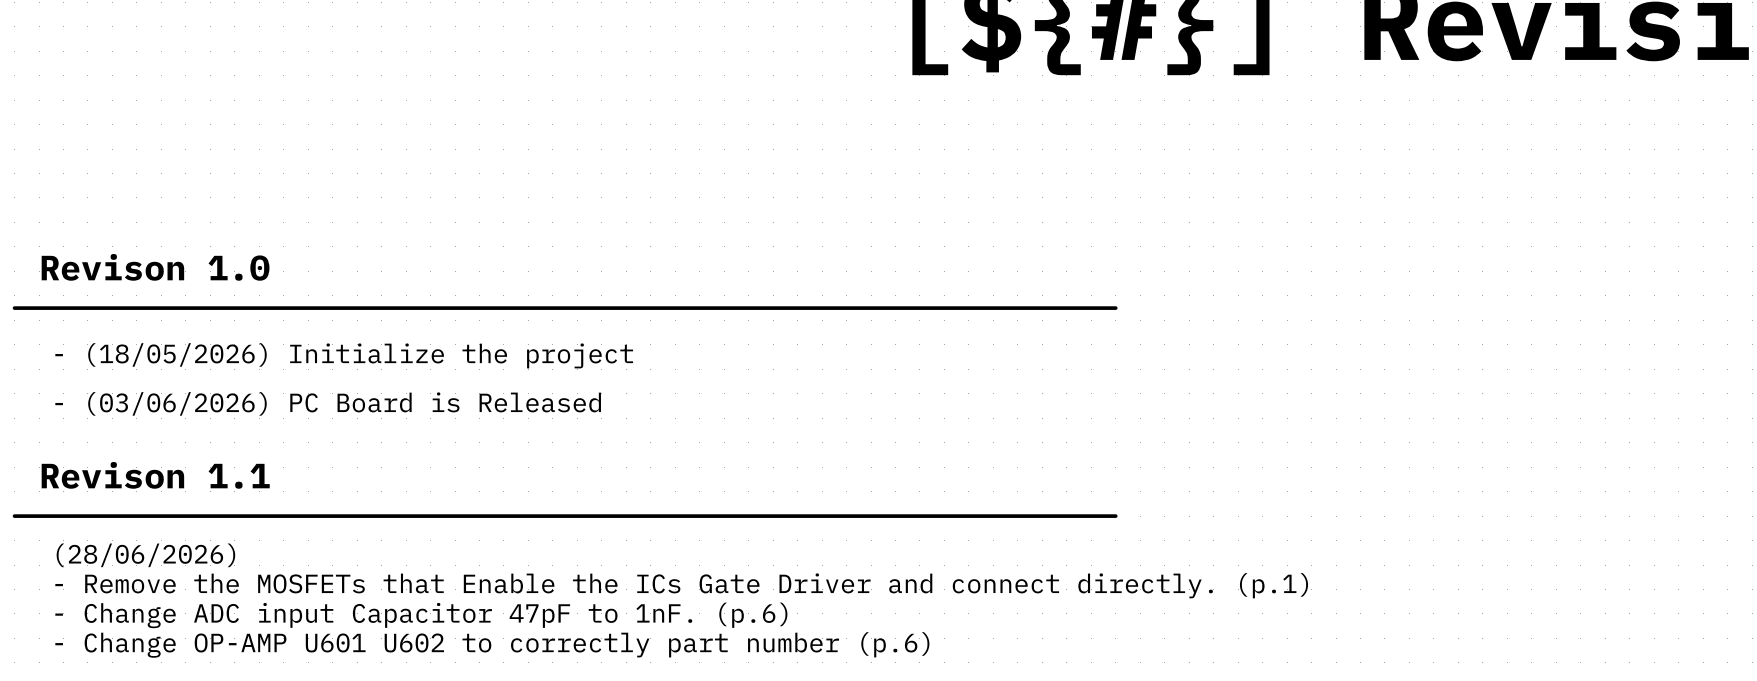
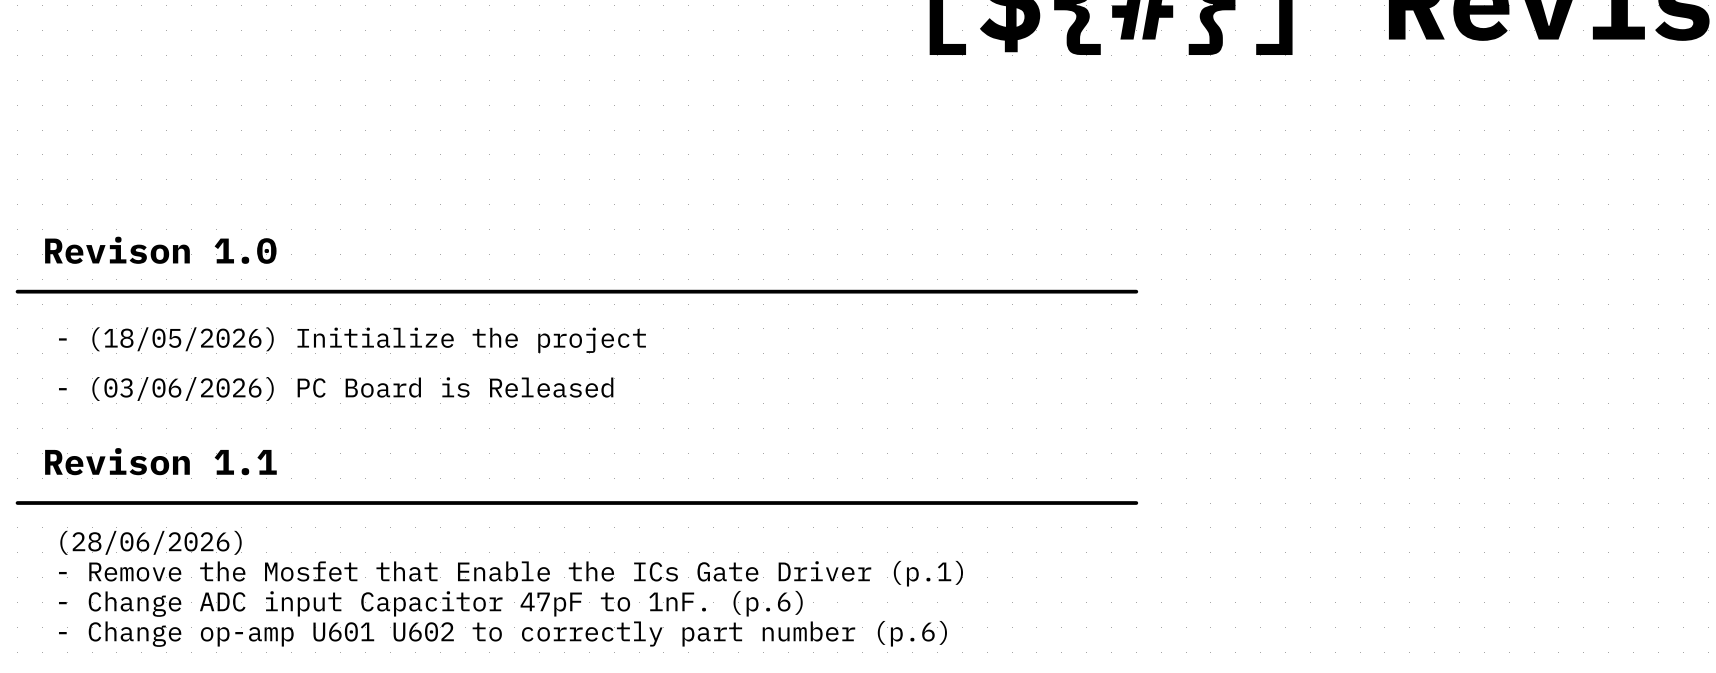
text: - Remove the MOSFETs that Enable the ICs Gate Driver and connect directly. (p.1) (681, 585) -> - Remove the Mosfet that Enable the ICs Gate Driver (p.1) (511, 573)
text: - Change OP-AMP U601 U602 to correctly part number (p.6) (492, 644) -> - Change op-amp U601 U602 to correctly part number (p.6) (502, 633)

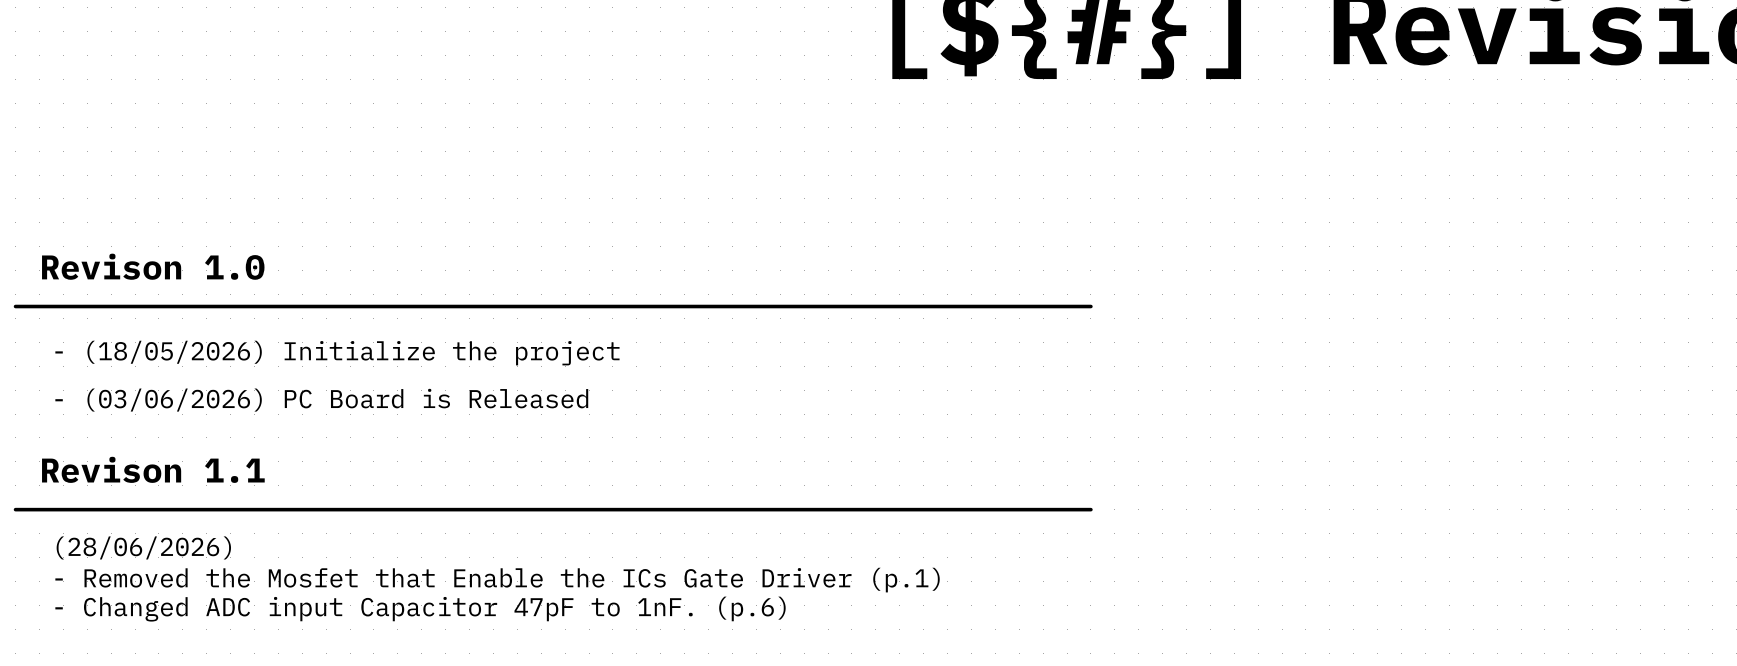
text: - Remove the Mosfet that Enable the ICs Gate Driver (p.1) (511, 573) -> - Removed the Mosfet that Enable the ICs Gate Driver (p.1) (497, 580)
text: - Change ADC input Capacitor 47pF to 1nF. (p.6) (430, 603) -> - Changed ADC input Capacitor 47pF to 1nF. (p.6) (420, 609)
text: - Change op-amp U601 U602 to correctly part number (p.6) (502, 633) -> none

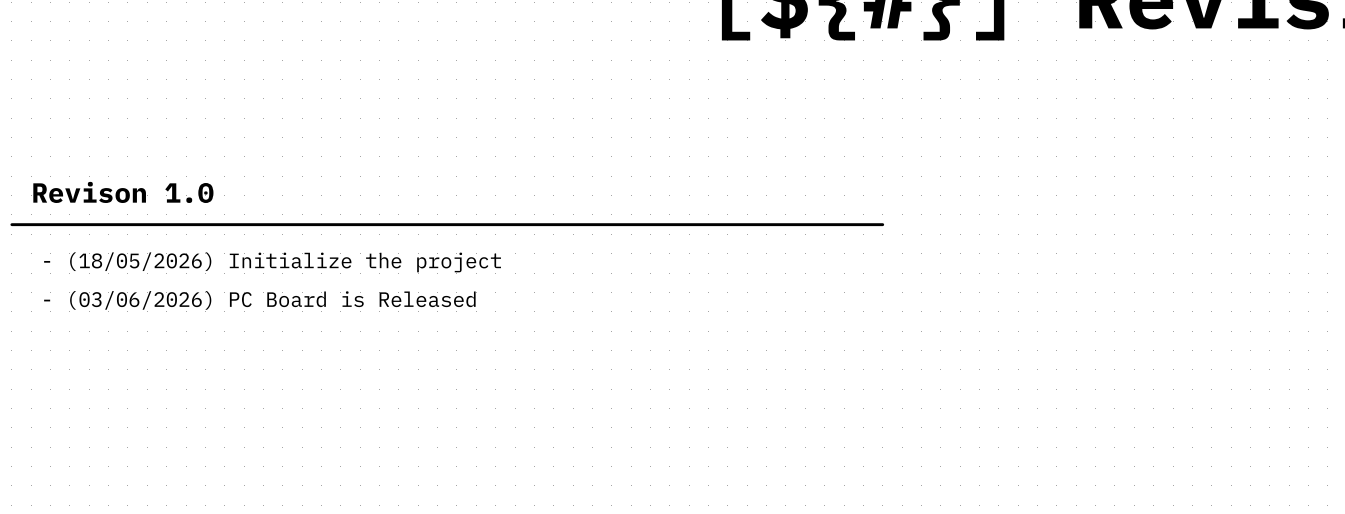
text: Revison 1.1 (153, 469) -> none
line: (15, 509) (1090, 509) -> none
text: (28/06/2026) (143, 547) -> none
text: - Removed the Mosfet that Enable the ICs Gate Driver (p.1) (497, 580) -> none
text: - Changed ADC input Capacitor 47pF to 1nF. (p.6) (420, 609) -> none

